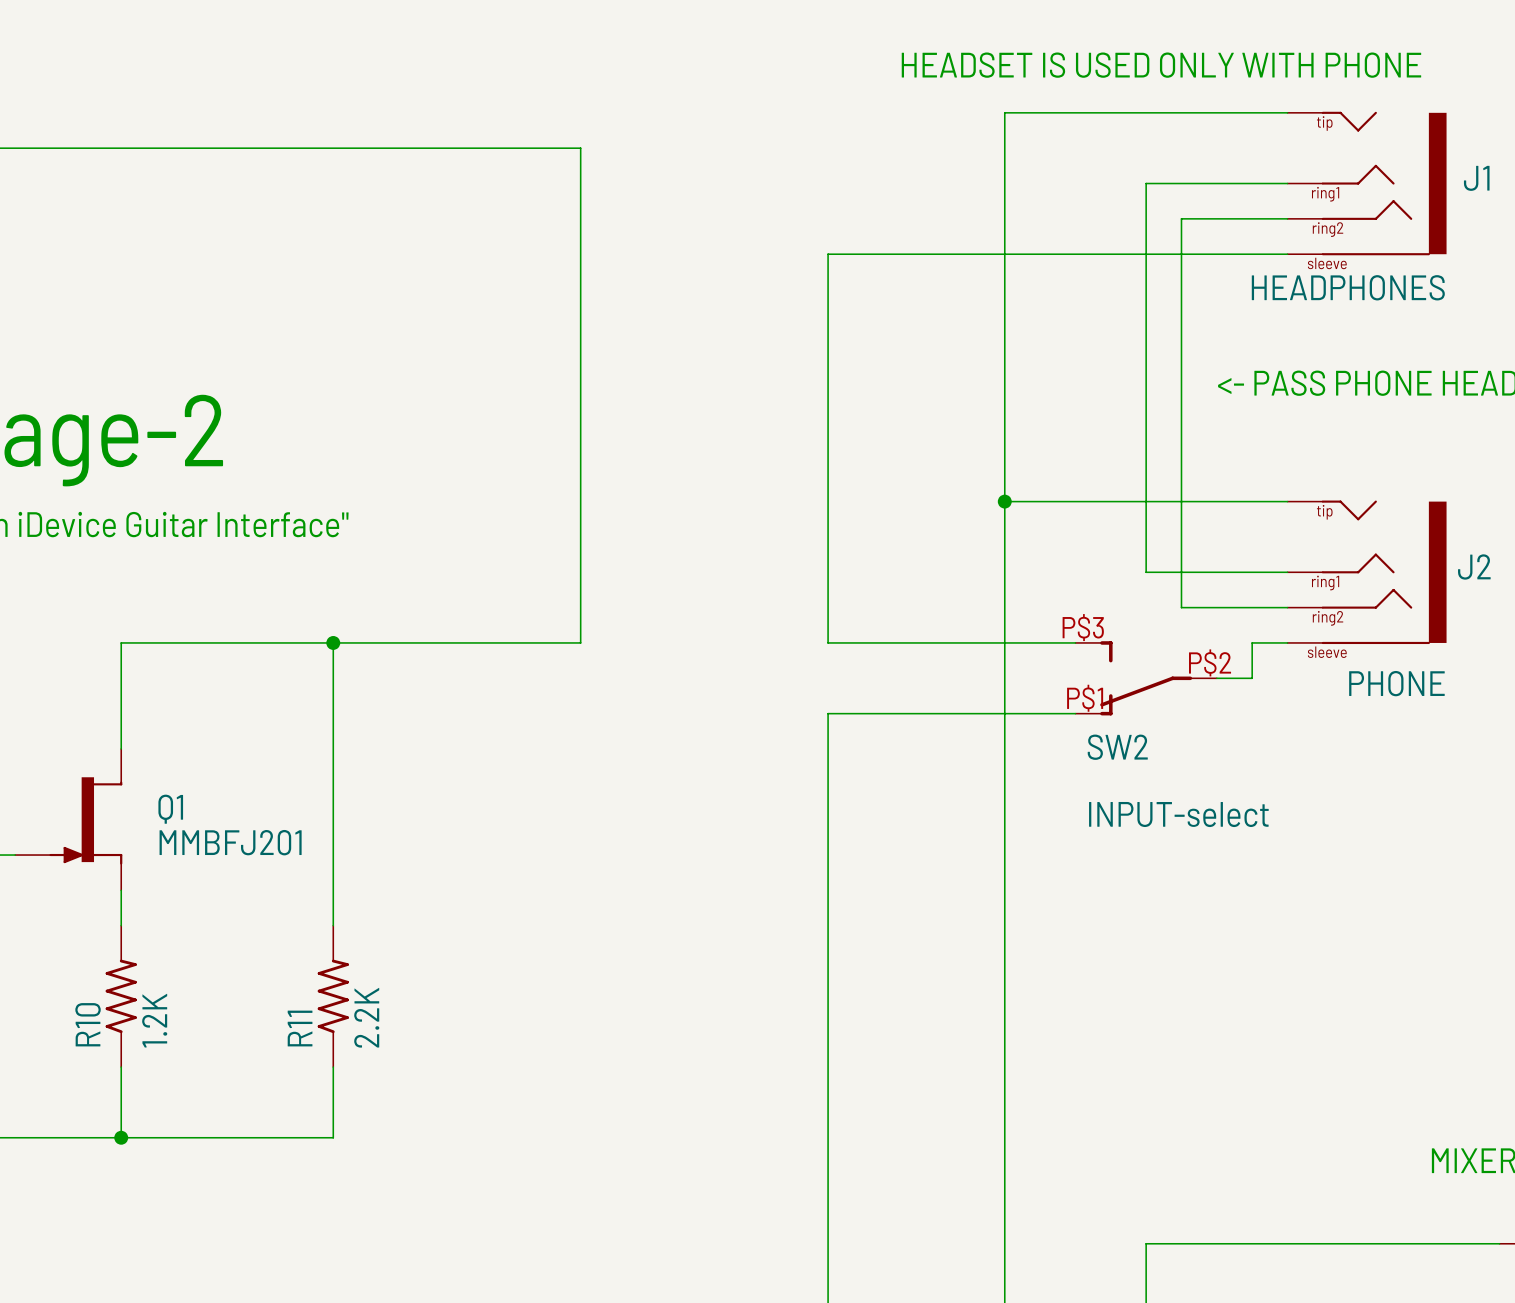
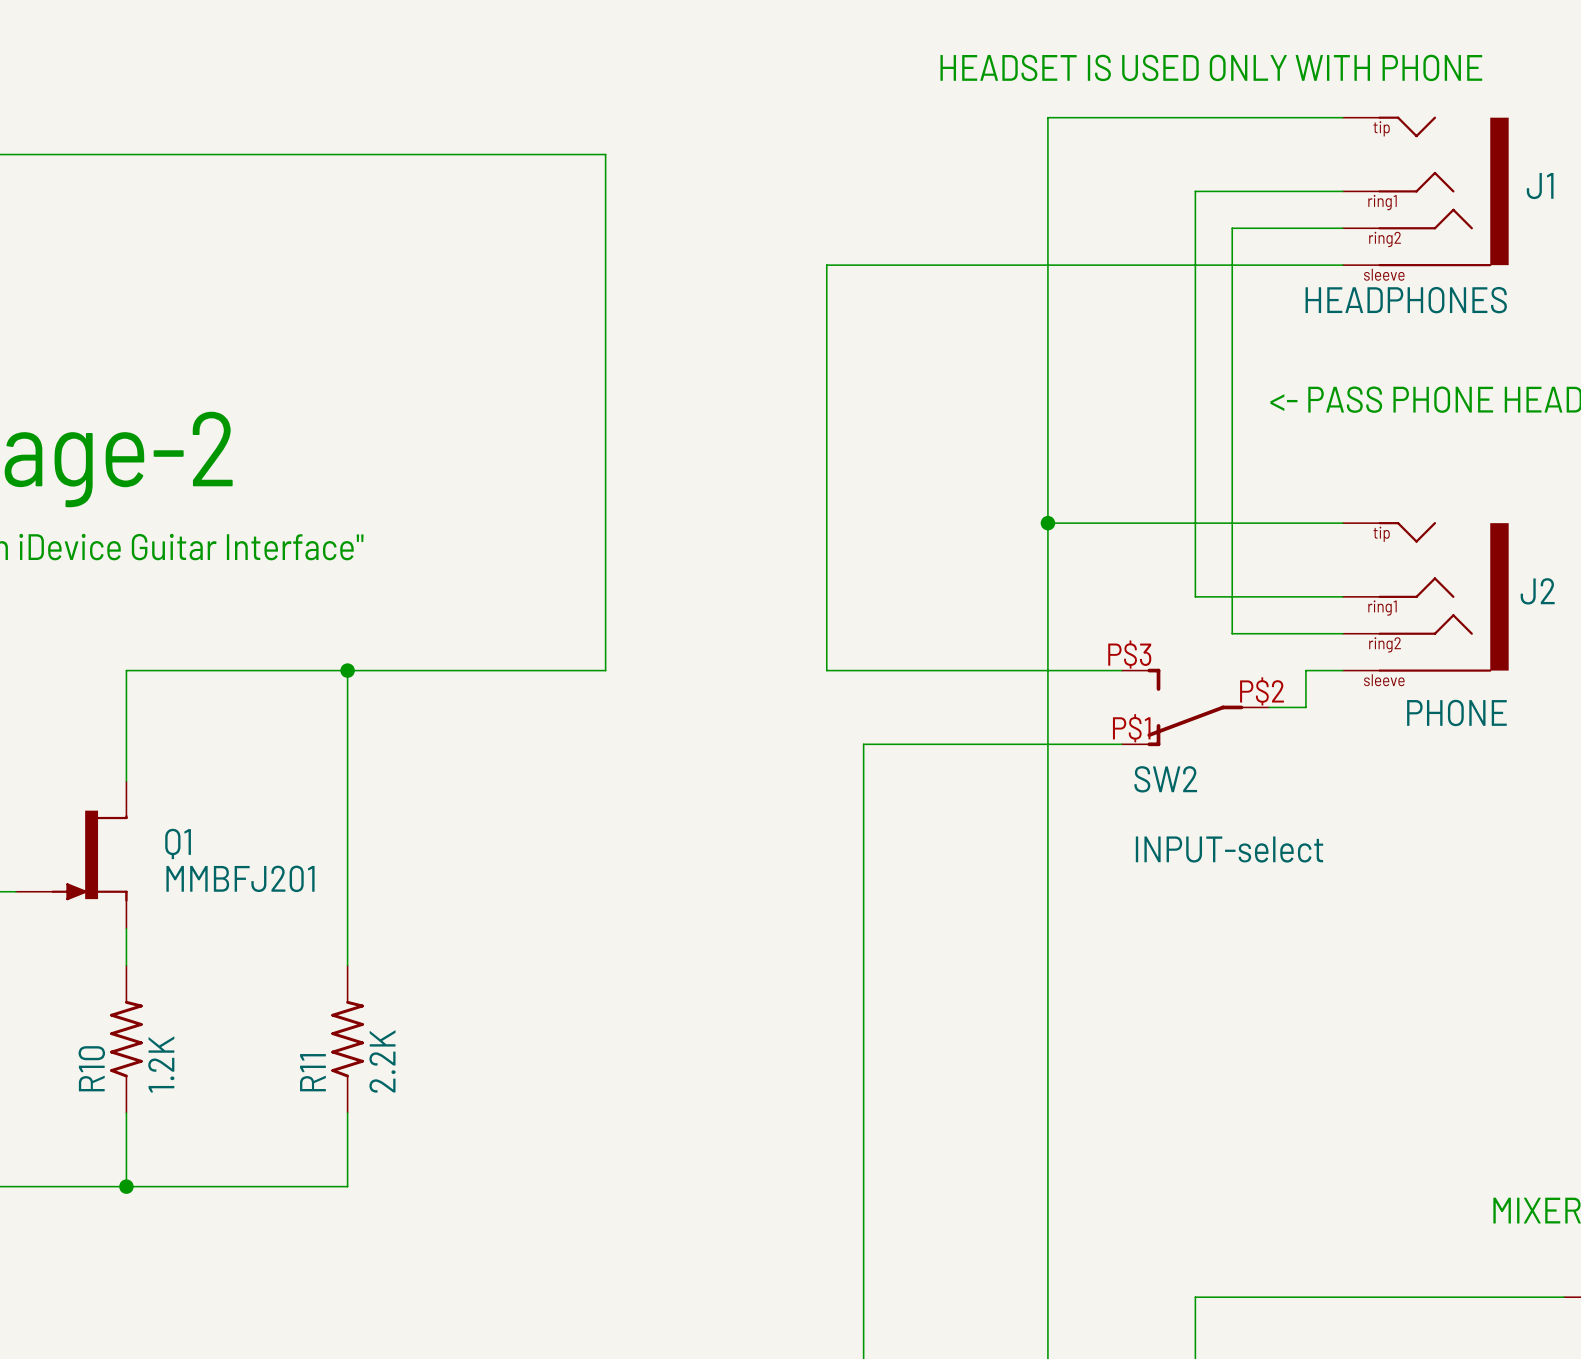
wire: (828, 254) (828, 642) -> (863, 265) (826, 265) (826, 670) (863, 670)

